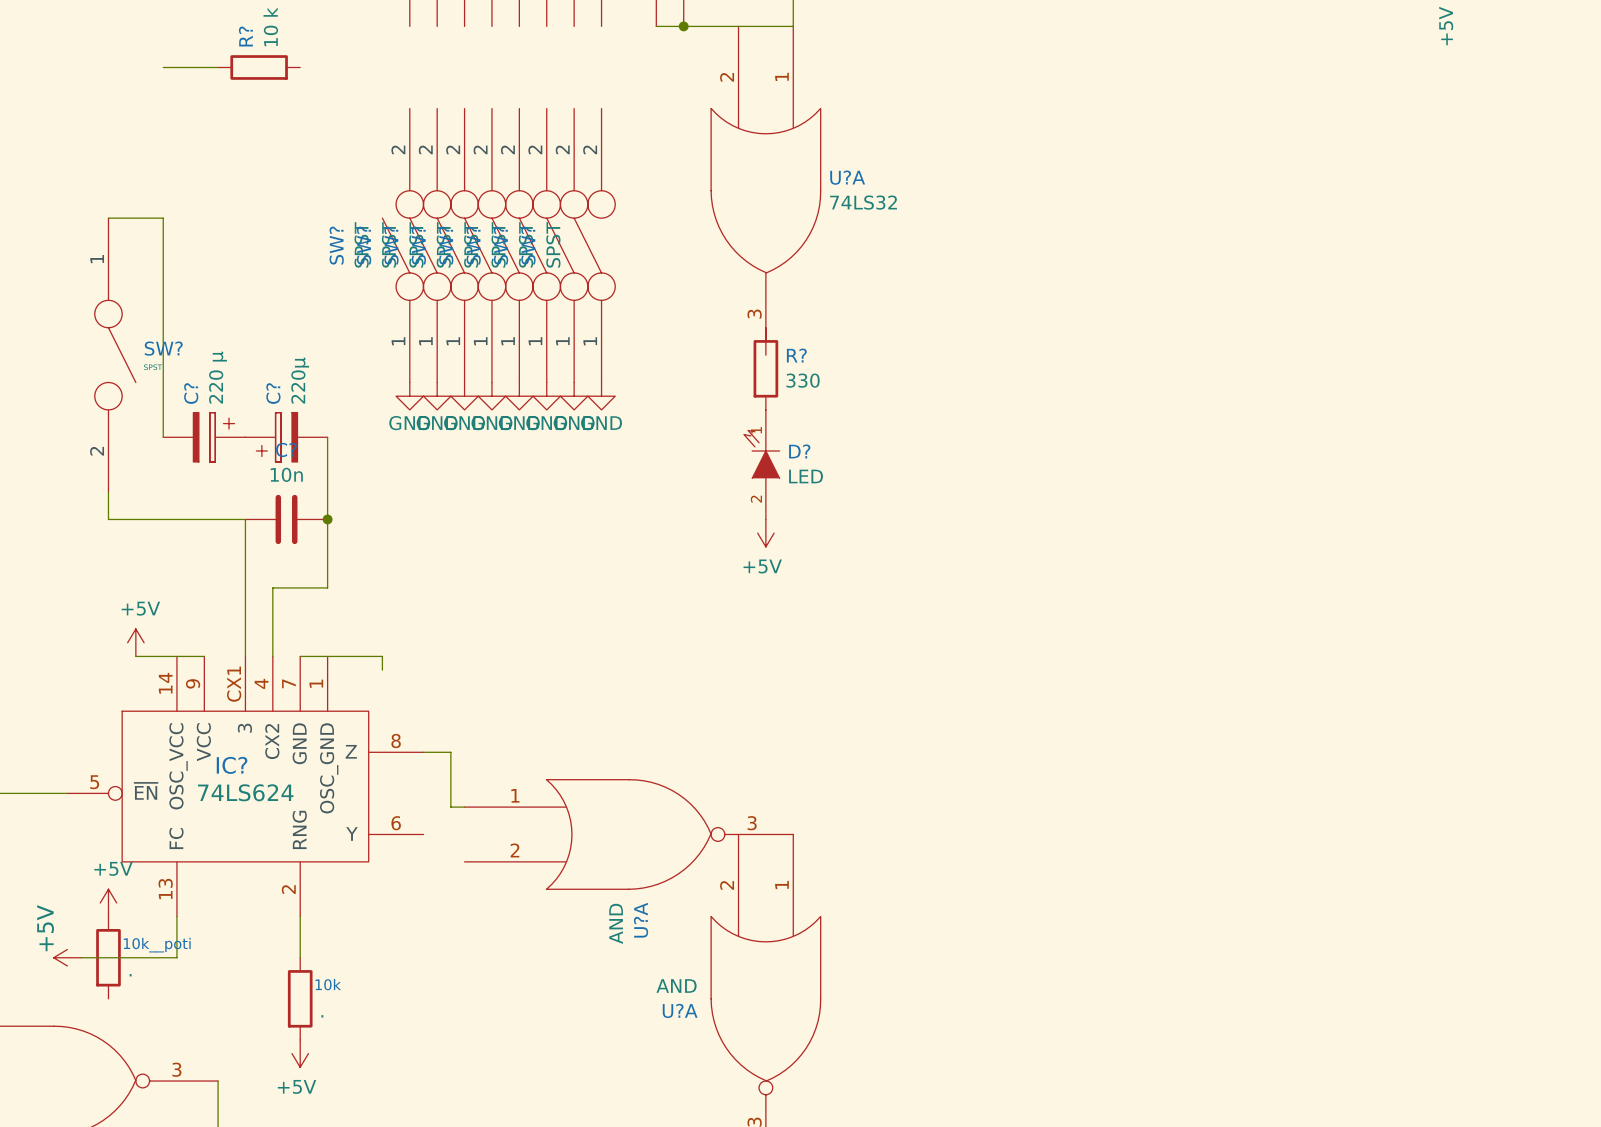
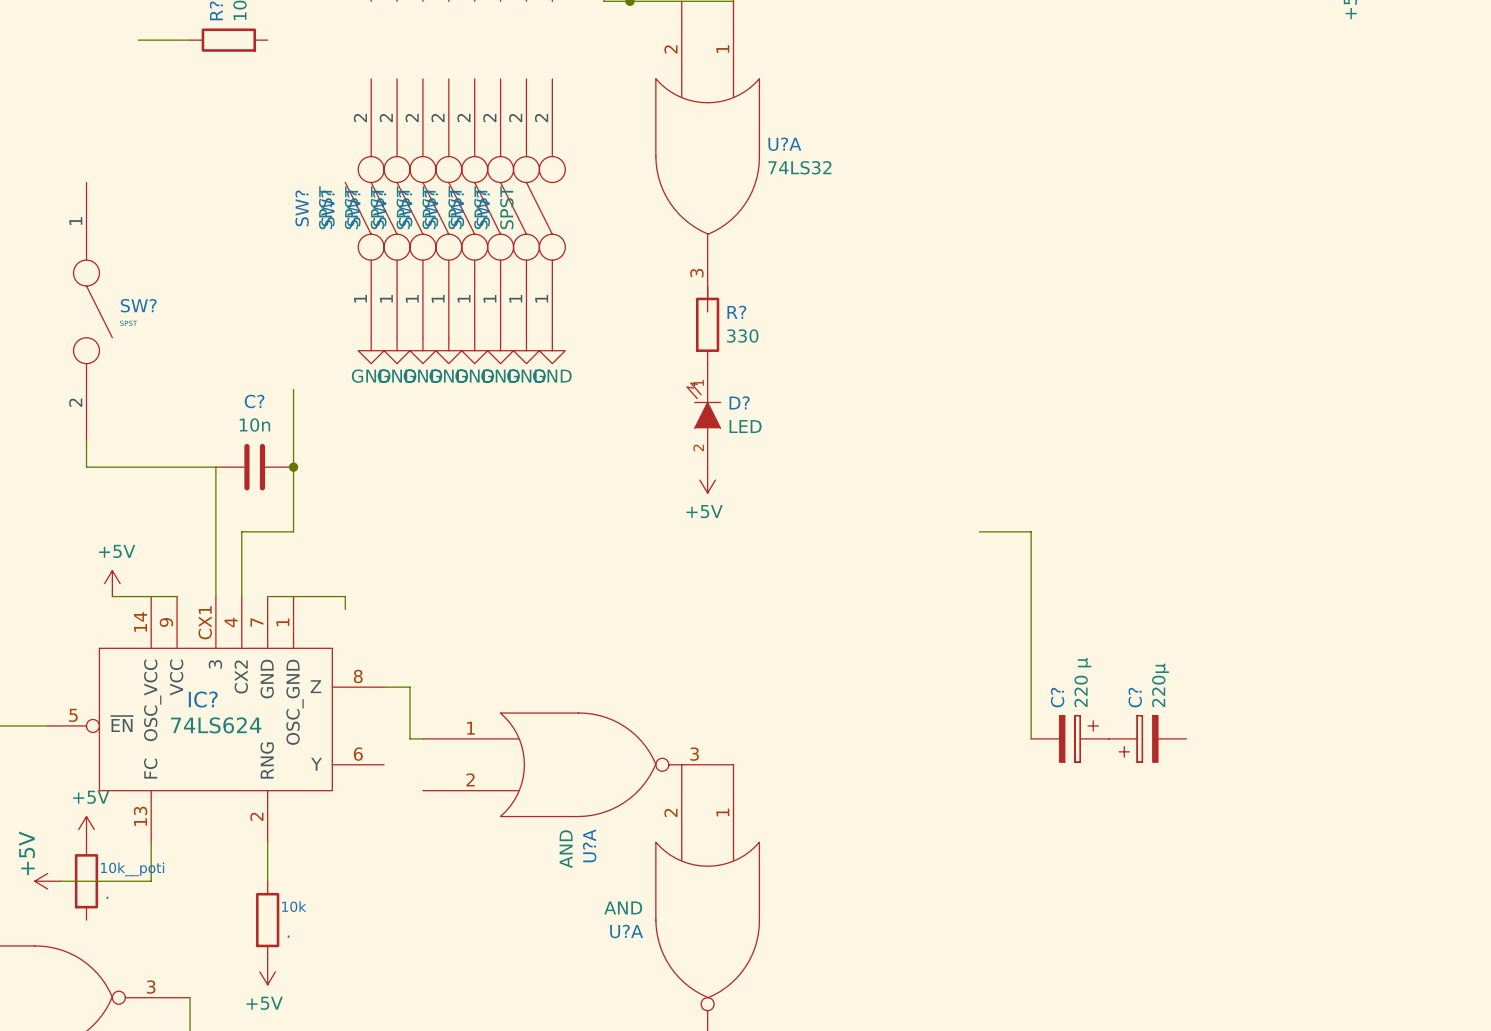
wire: (108, 218) (163, 218) (163, 437) -> none
C?: 220 µ (204, 437) -> none
C?: 220µ (286, 437) -> none
wire: none -> (979, 531) (1031, 531) (1031, 738)
C?: none -> 220 µ (1069, 738)
C?: none -> 220µ (1147, 738)

